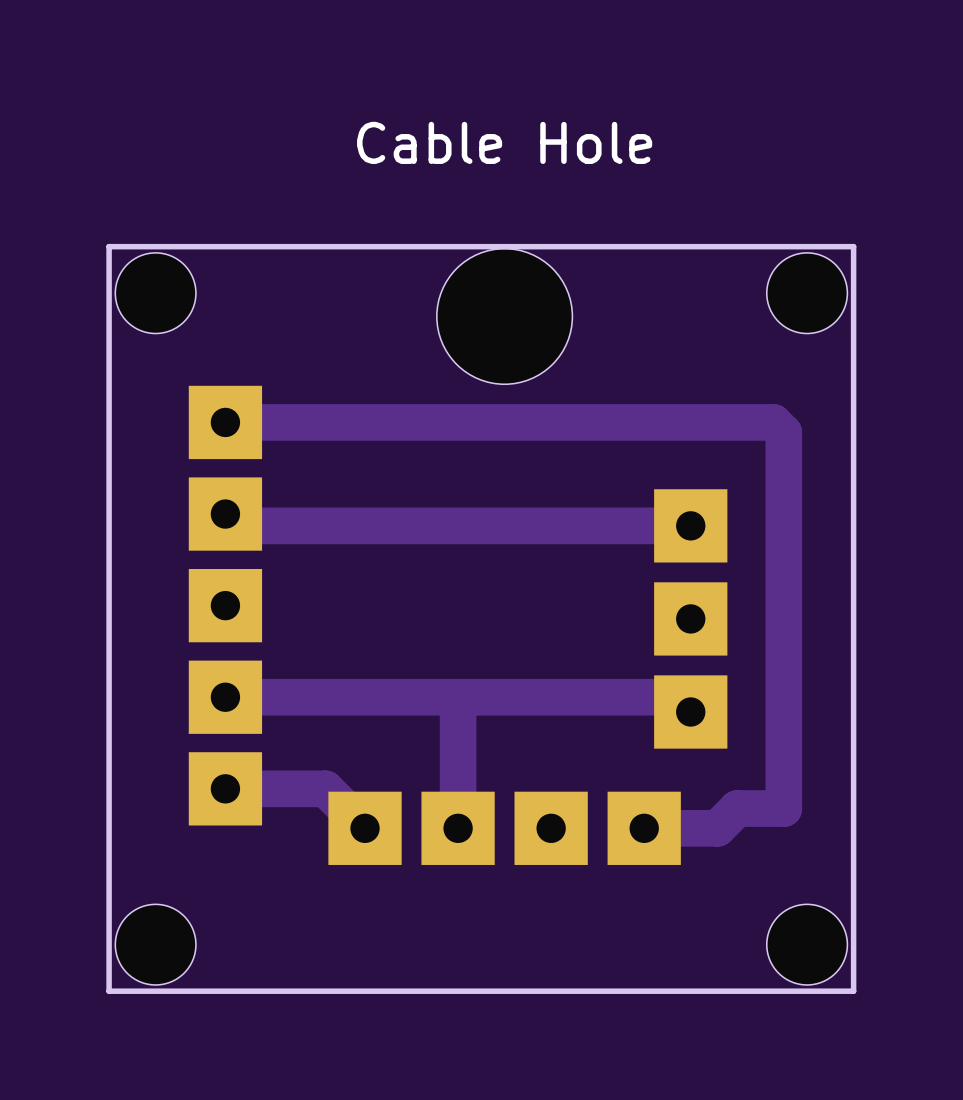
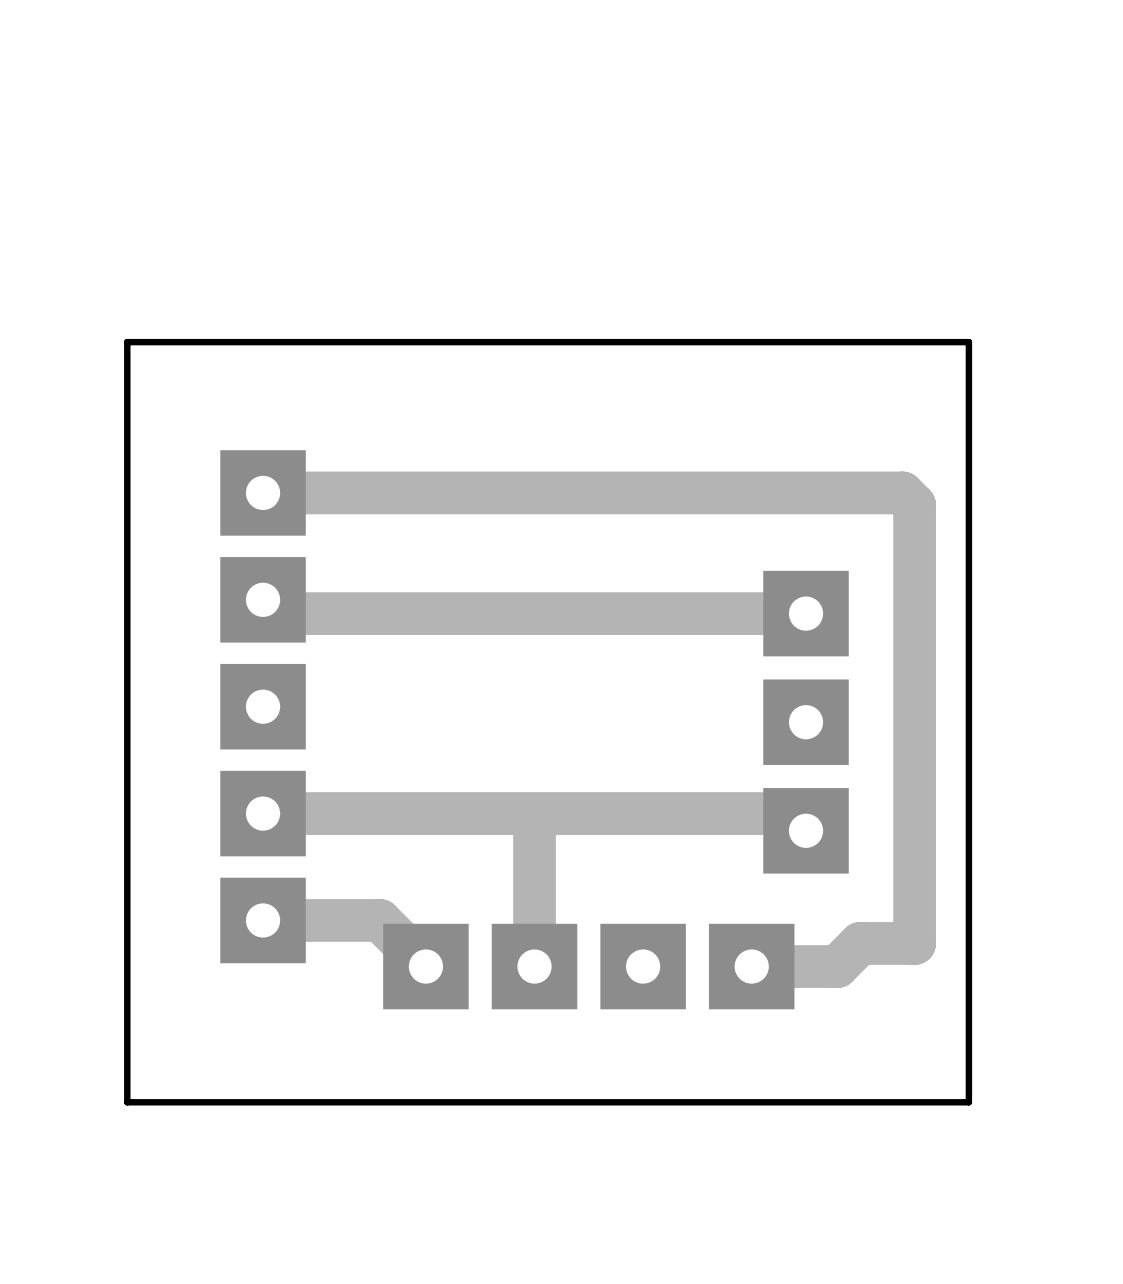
board edge: (109, 293) (109, 246) (853, 246) (853, 991) (109, 991) (109, 944) -> (127, 342) (968, 342) (968, 1102) (127, 1102)
part: (155, 293) -> none
part: (807, 293) -> none
Cable Hole: (504, 316) -> none
part: (155, 944) -> none
part: (807, 944) -> none

